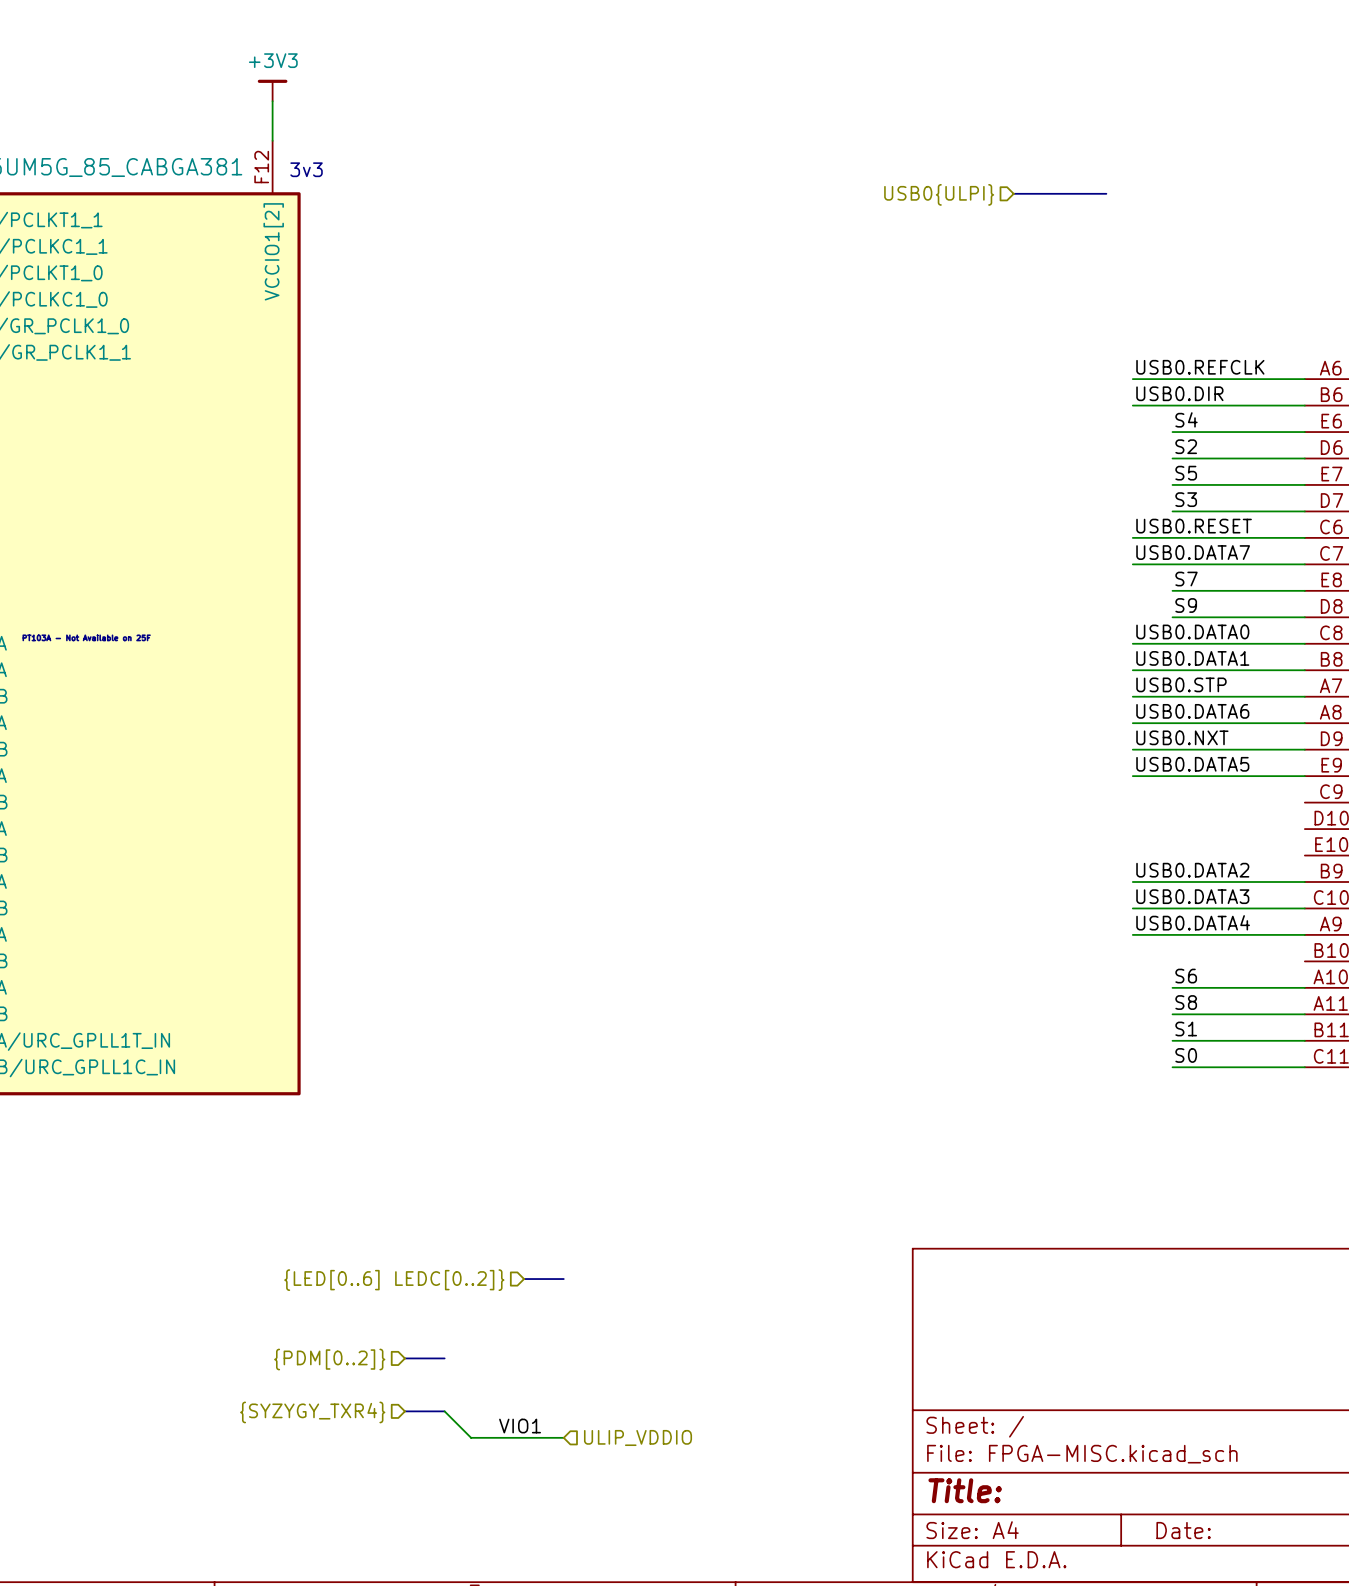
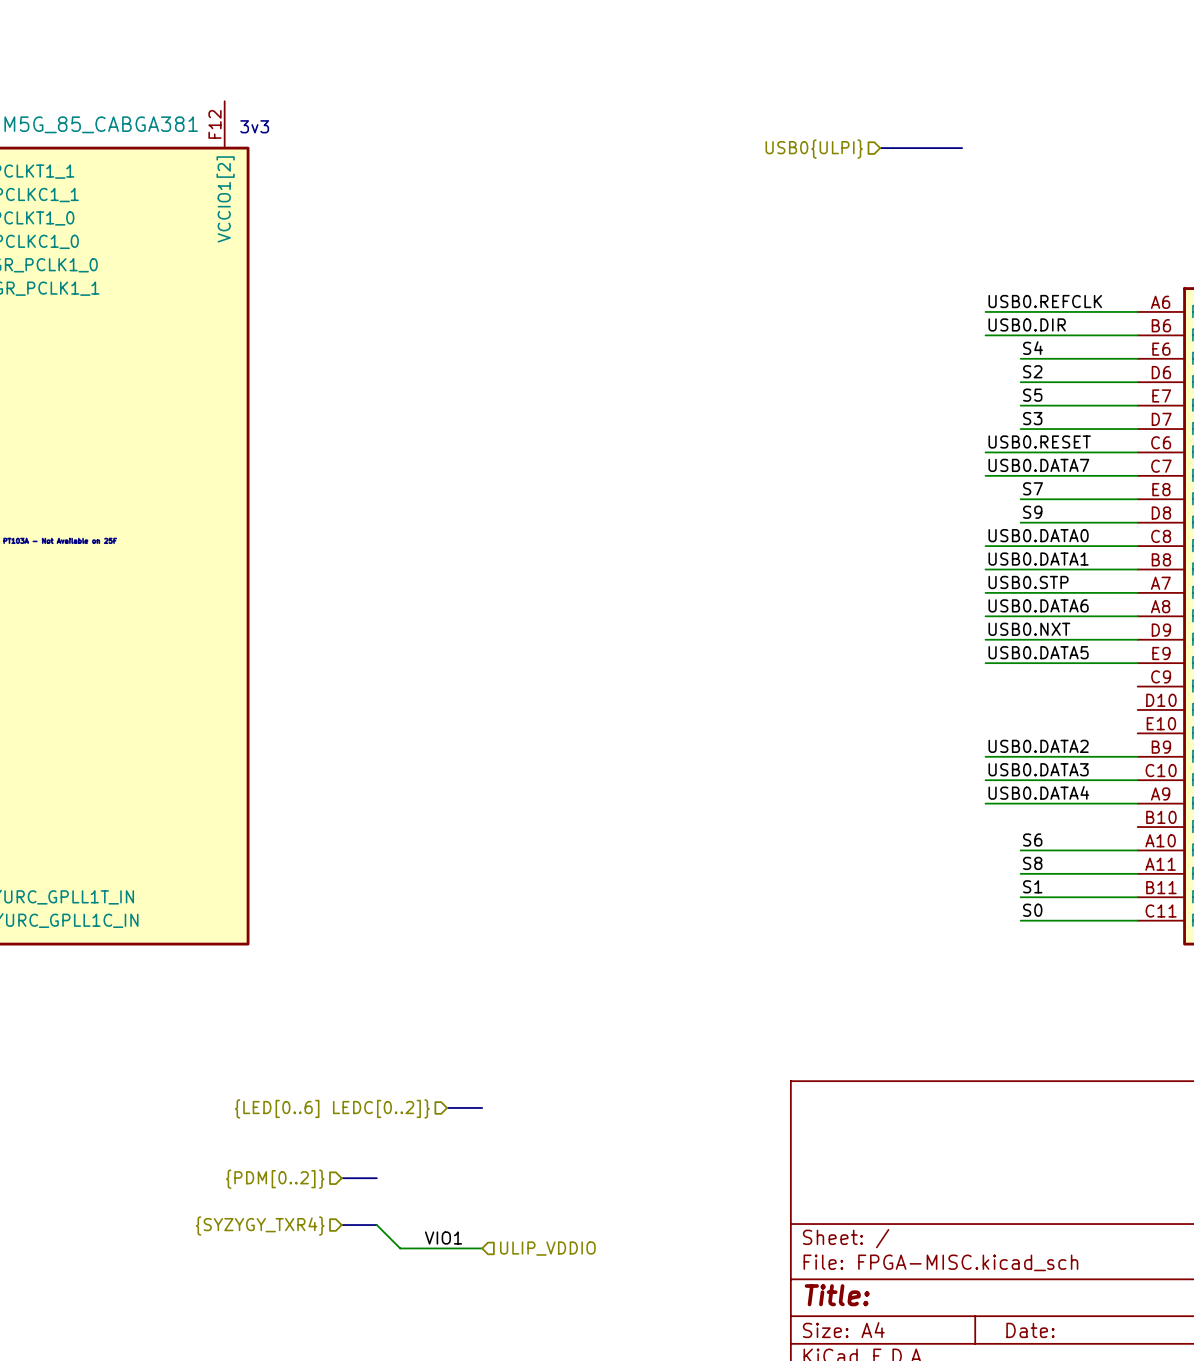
power symbol: +3V3 (272, 90) -> none
wire: (272, 101) (272, 140) -> none

